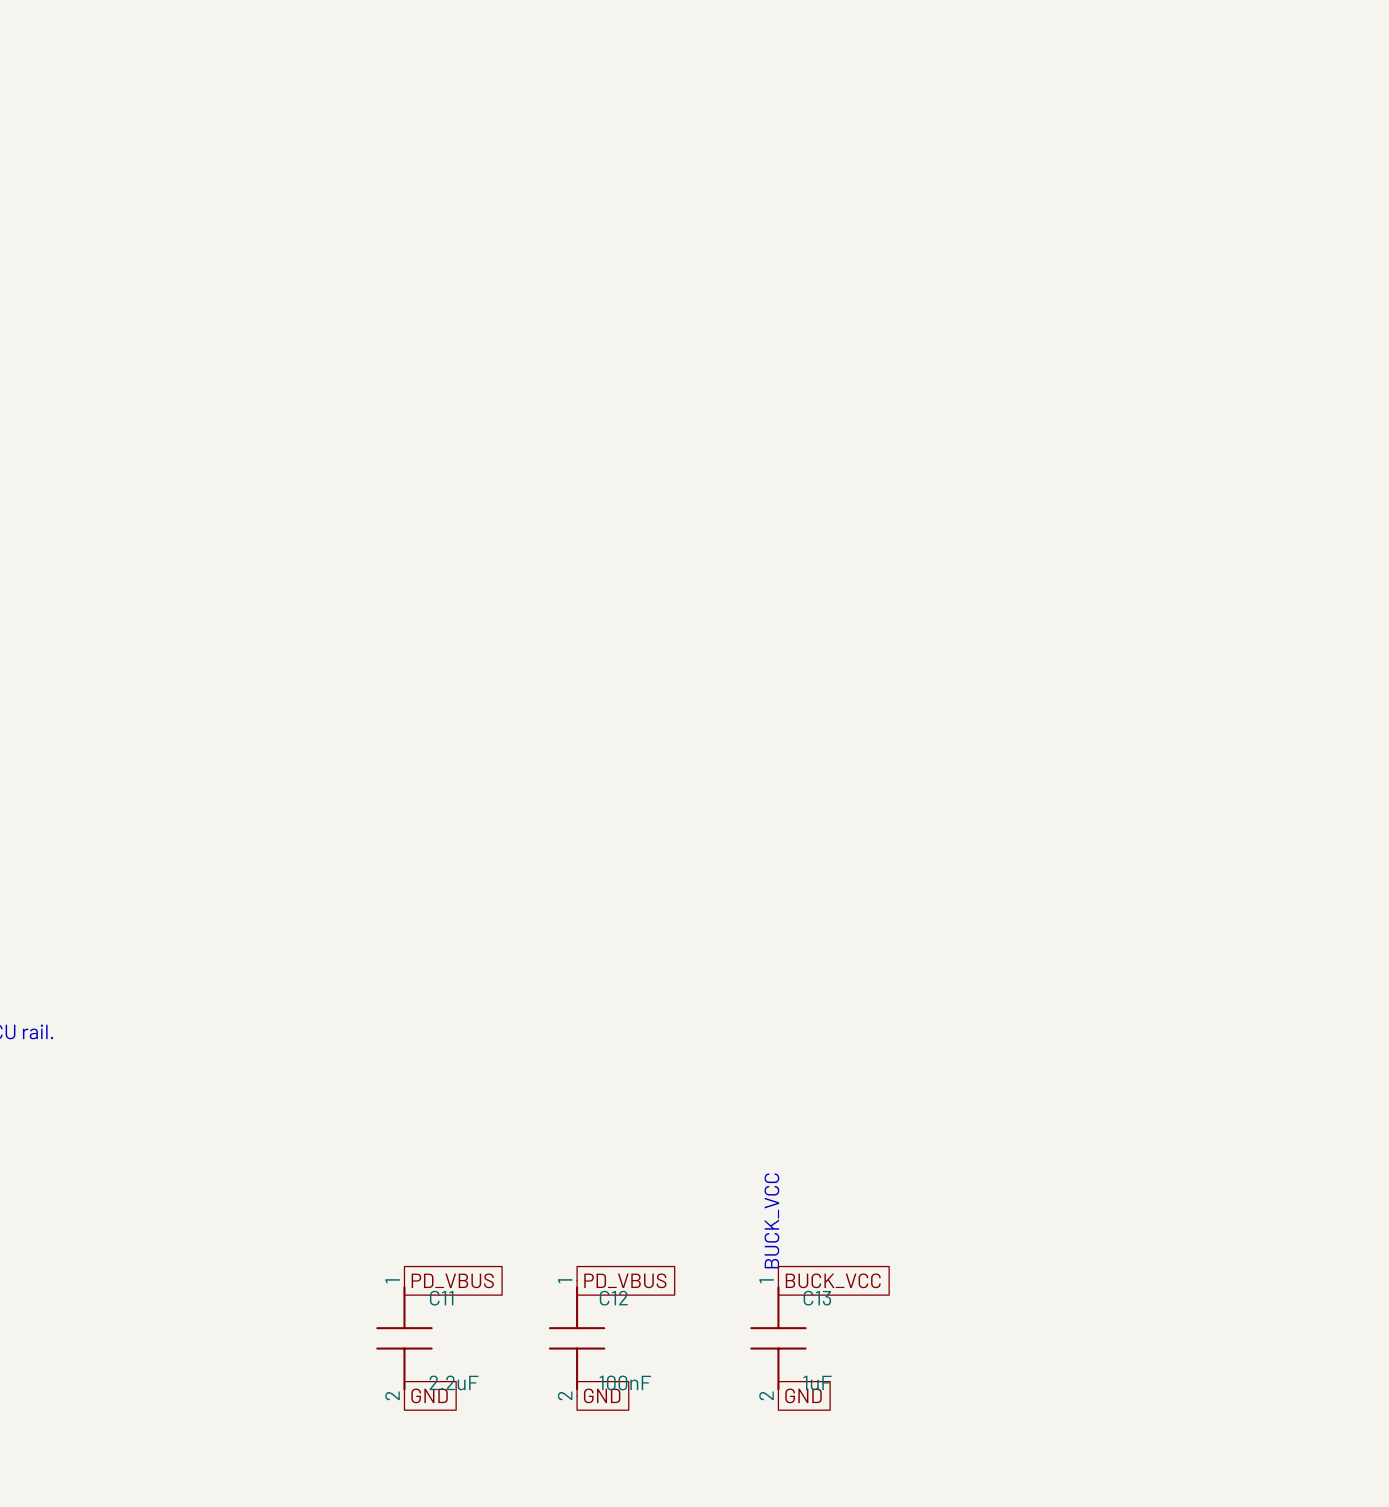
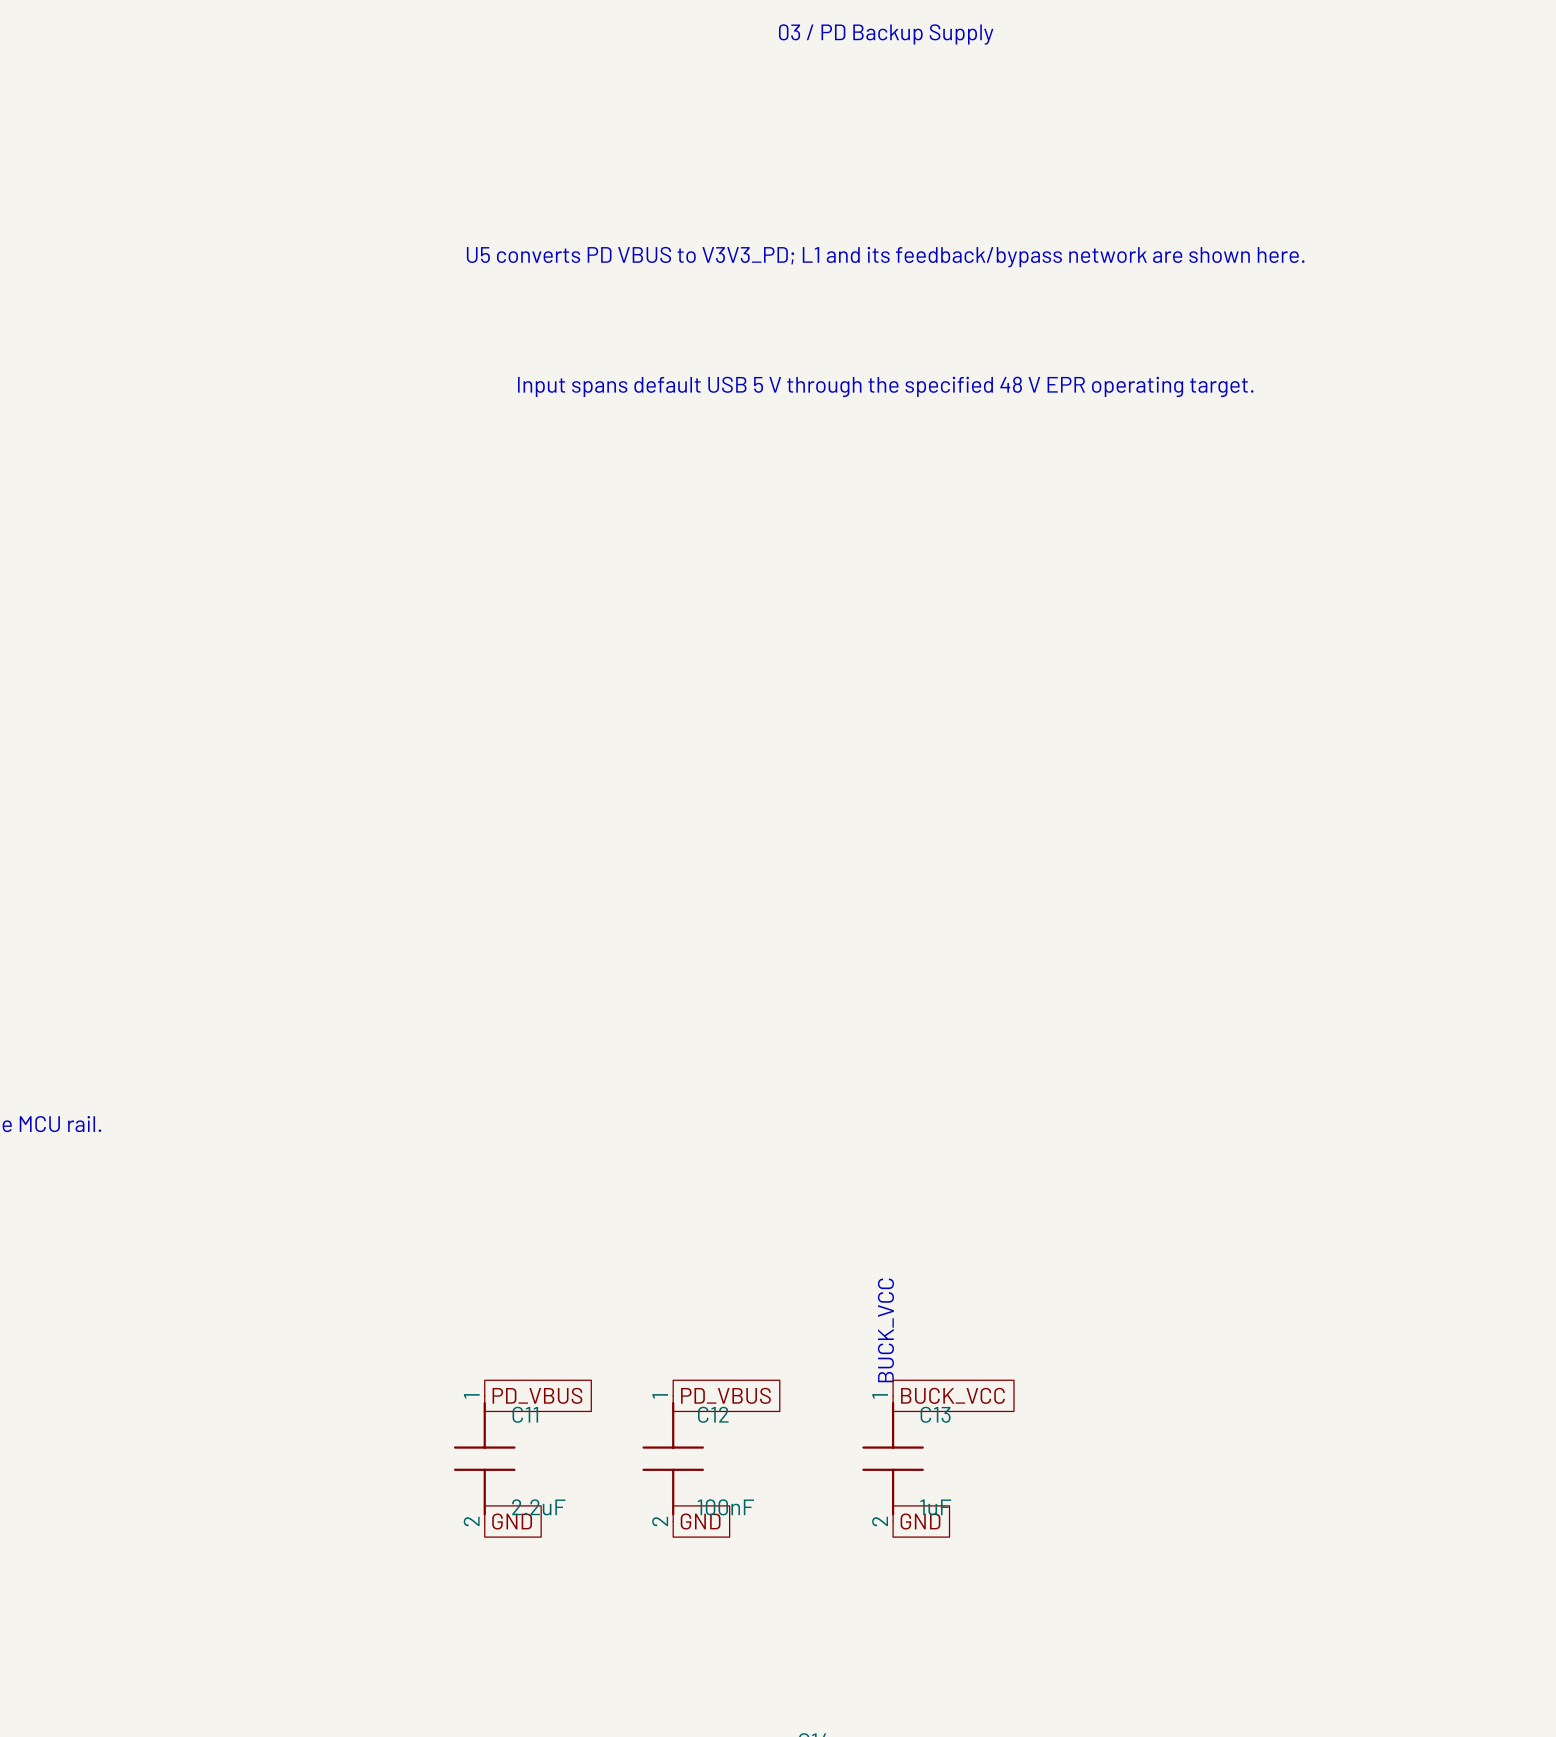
text: none -> 03 / PD Backup Supply (886, 34)
text: none -> U5 converts PD VBUS to V3V3_PD; L1 and its feedback/bypass network are shown here. (885, 257)
text: none -> Input spans default USB 5 V through the specified 48 V EPR operating target. (885, 386)

